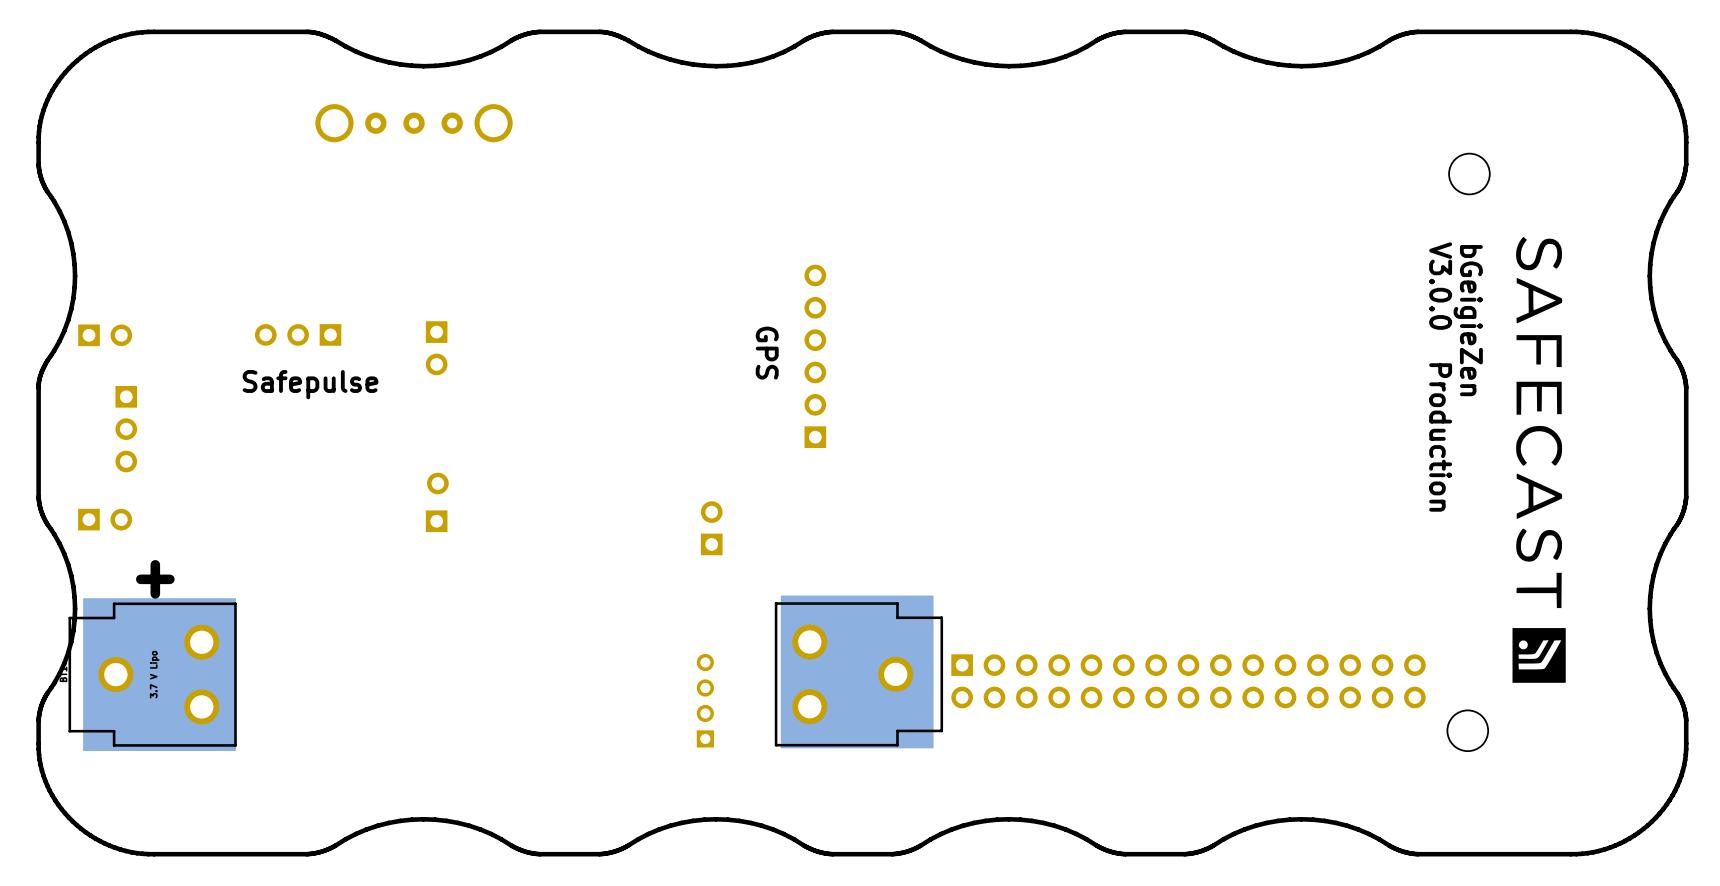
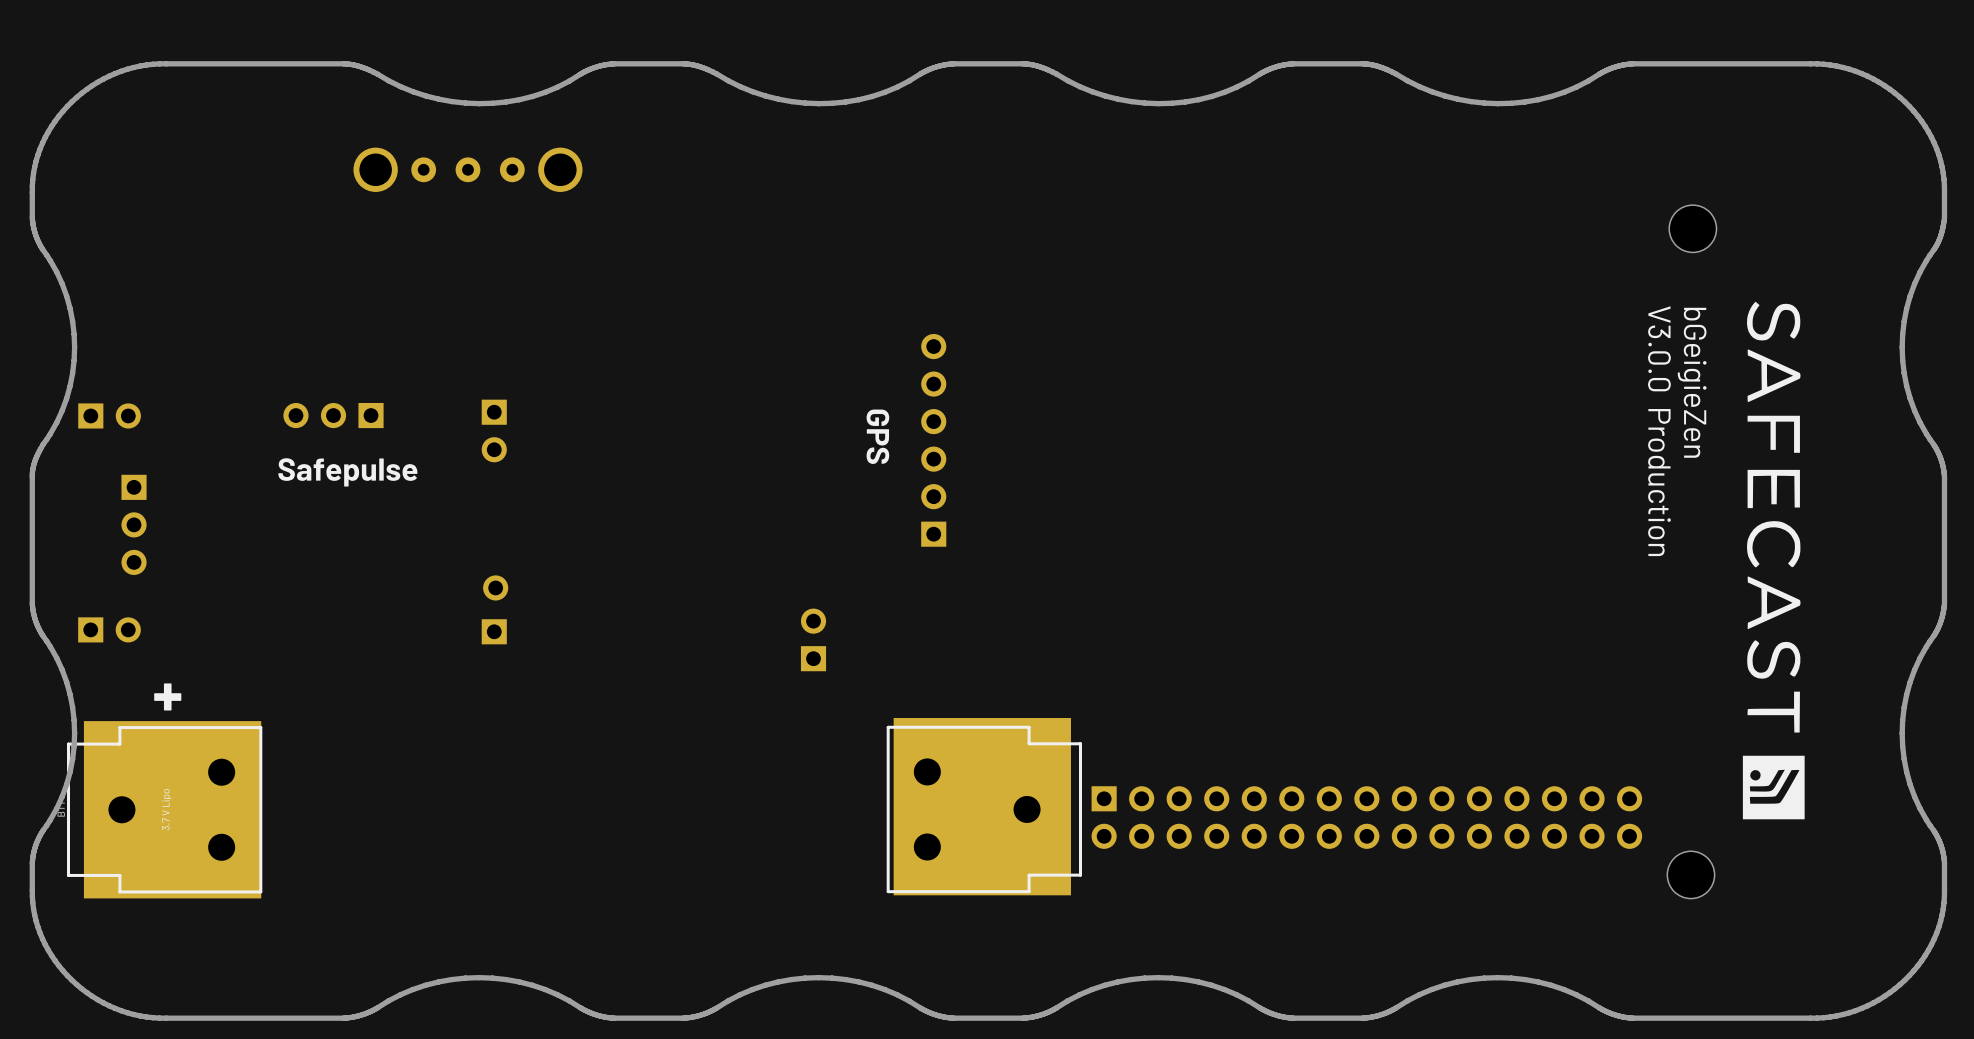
part: (705, 700) -> none

